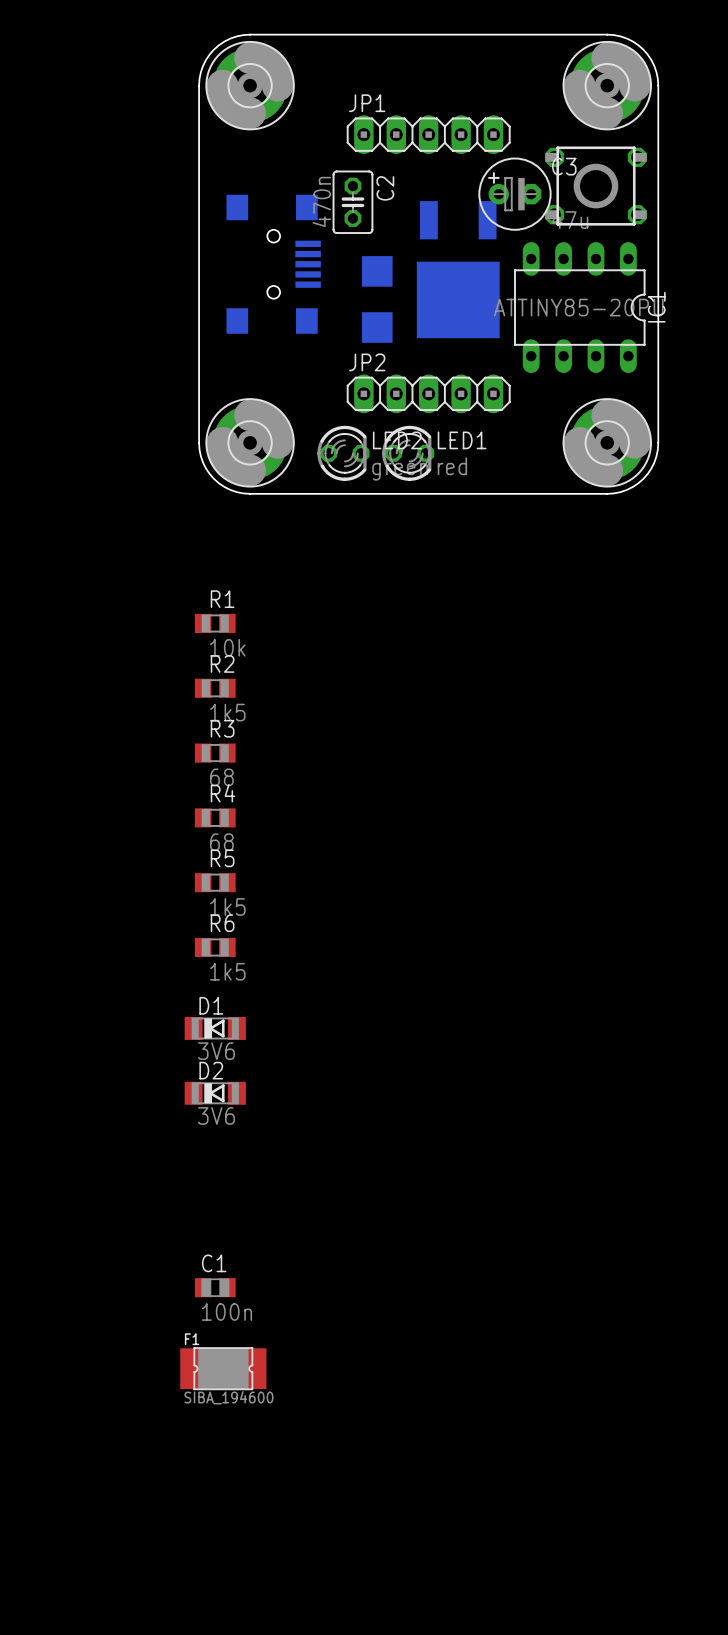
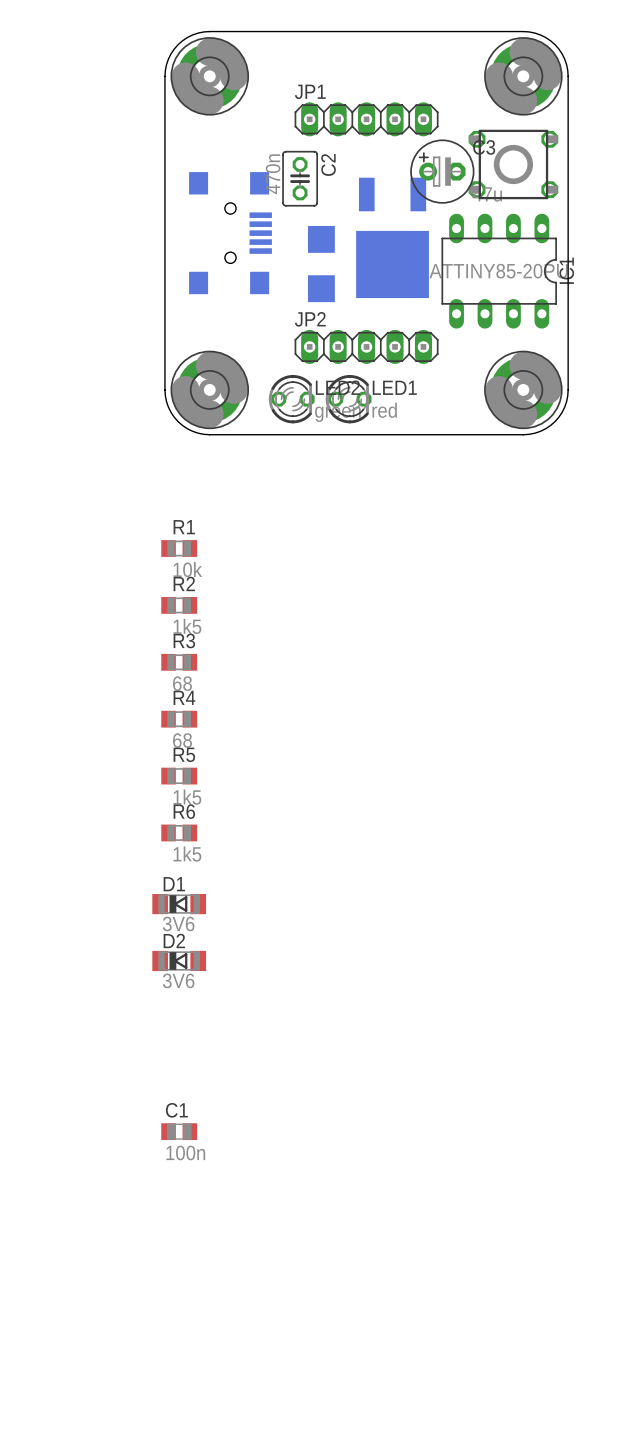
F1: SIBA_194600 (223, 1368) -> none

